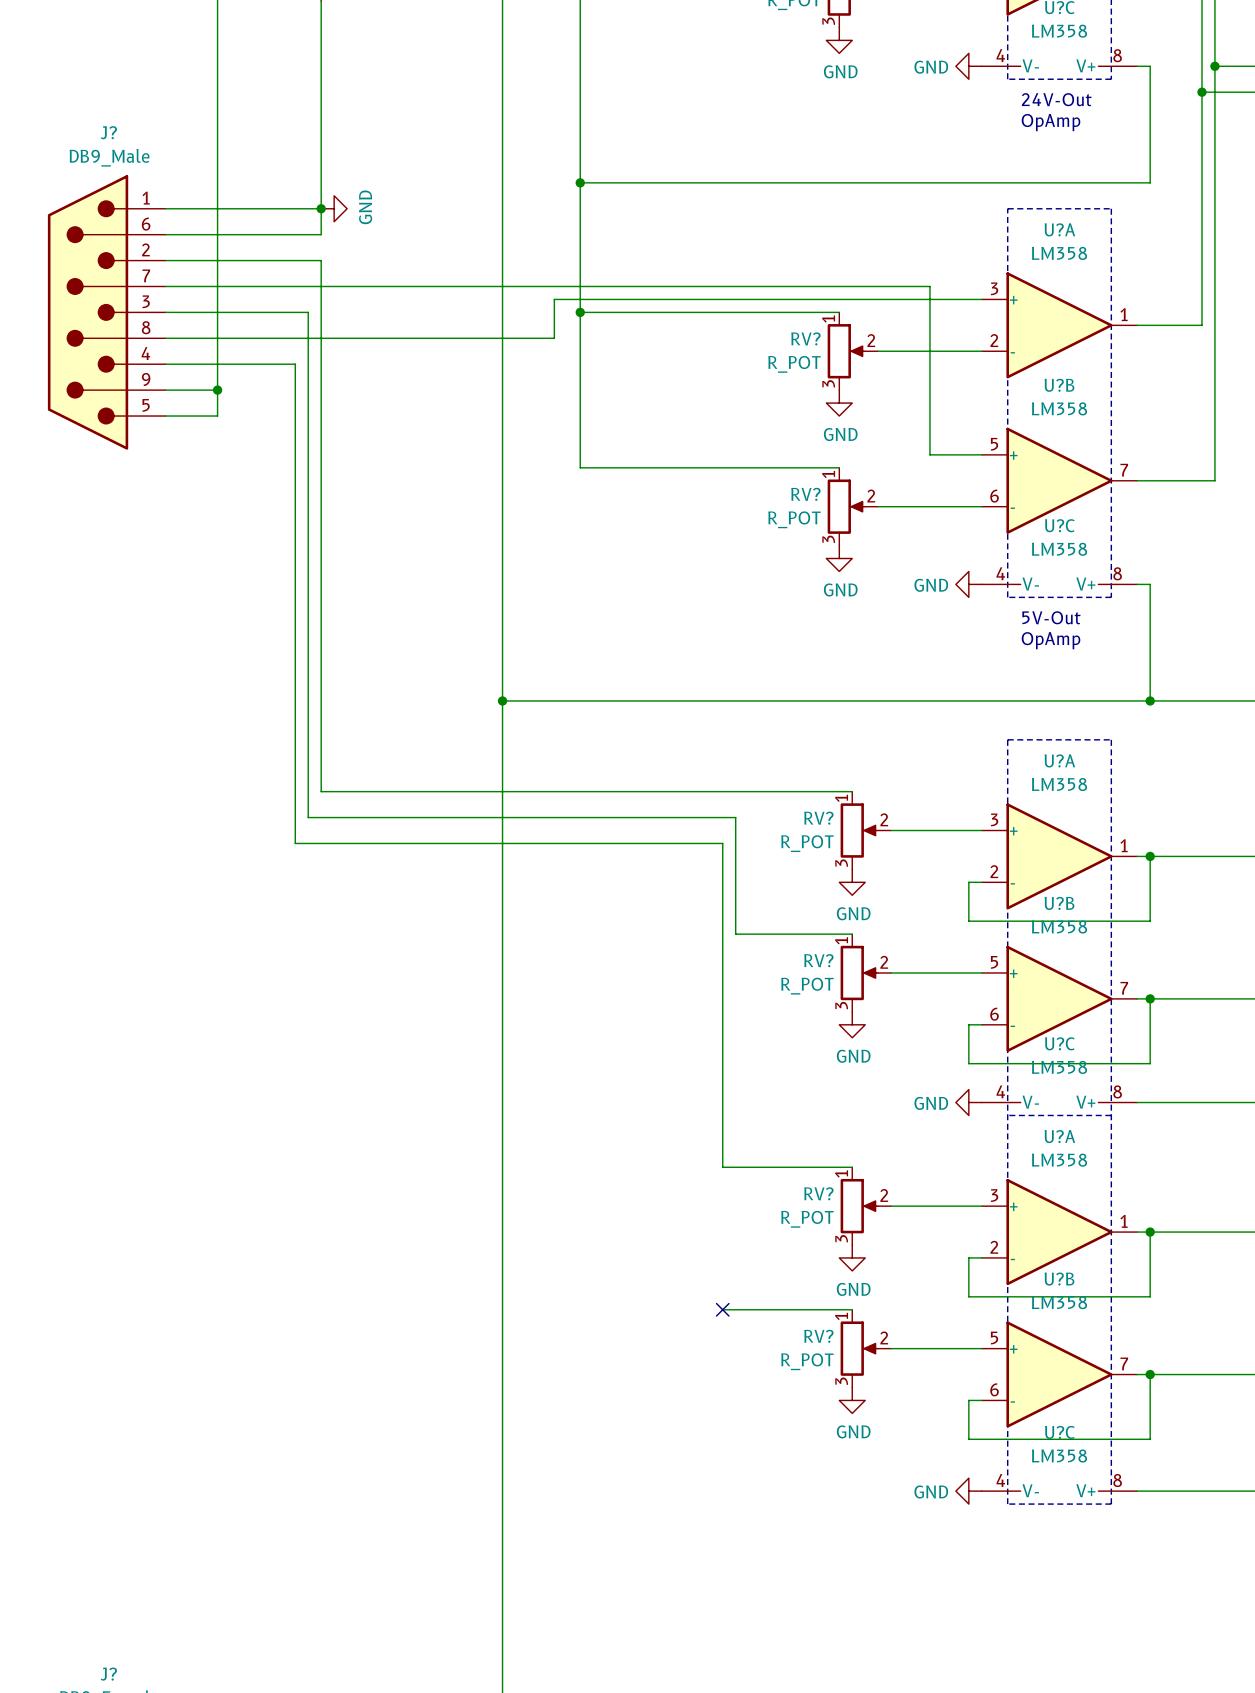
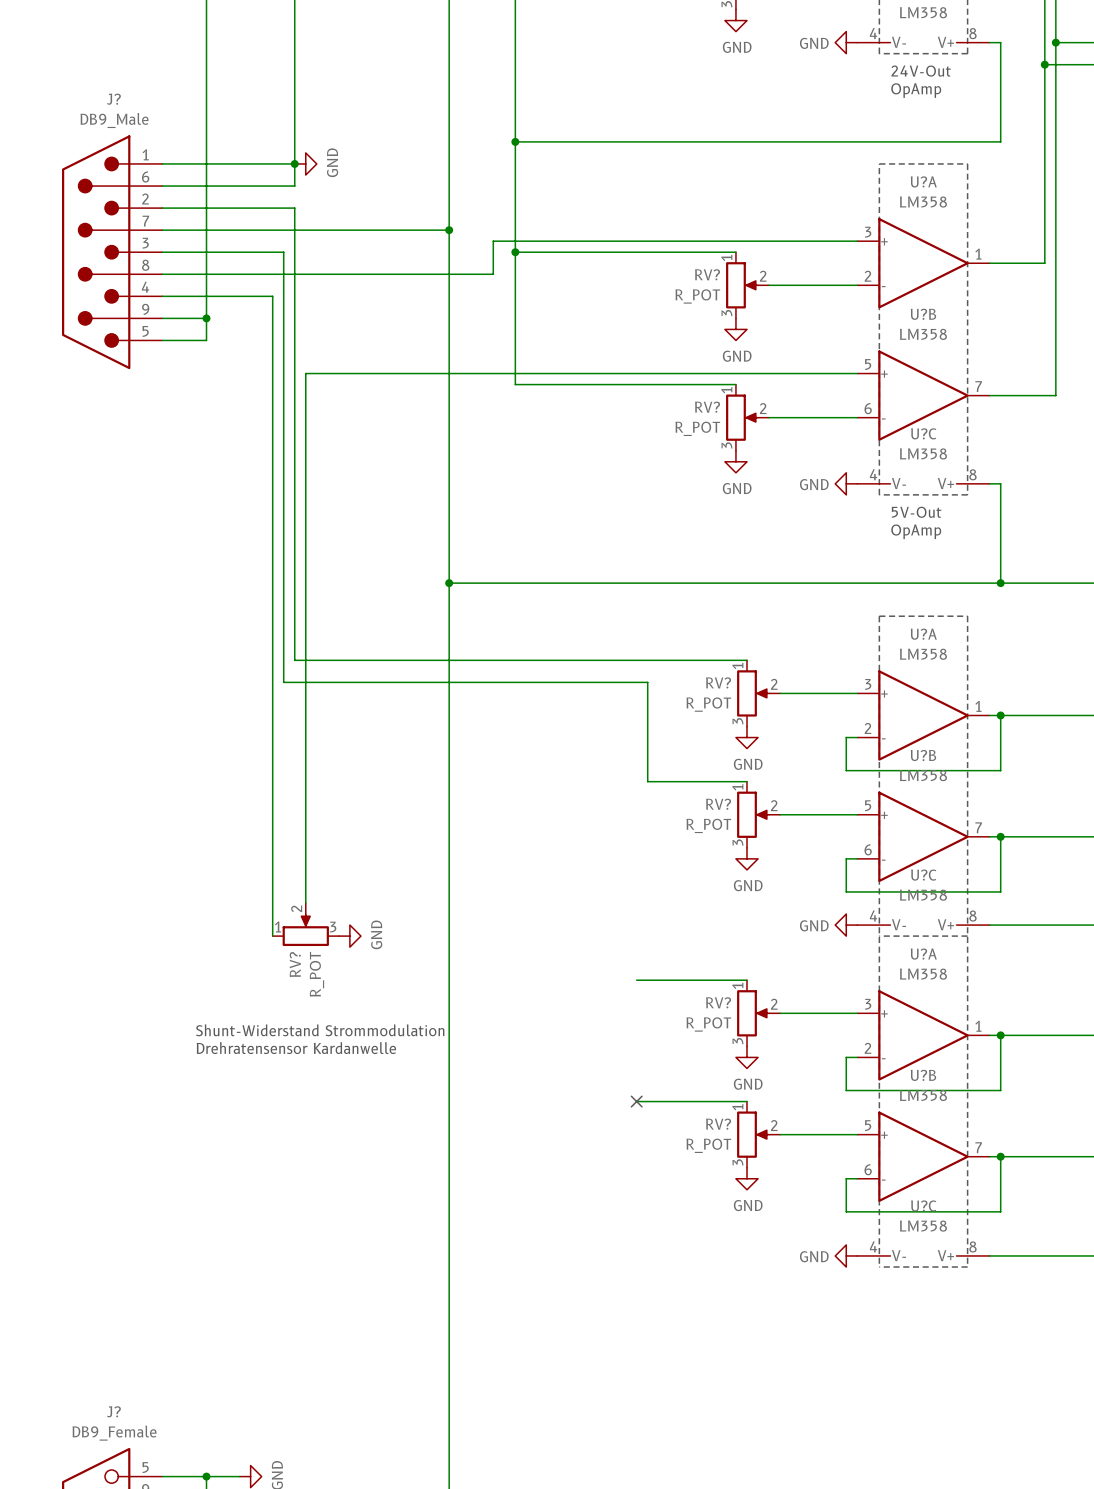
wire: (502, 286) (929, 286) (929, 454) -> (305, 903) (305, 373) (813, 373)
junction: none -> (449, 230)
wire: (295, 843) (722, 843) (722, 1167) -> (272, 704) (272, 936)
RV?: none -> R_POT (305, 924)
power symbol: none -> GND (349, 936)
text: none -> Shunt-Widerstand Strommodulation (320, 1030)
text: none -> Drehratensensor Kardanwelle (296, 1048)

